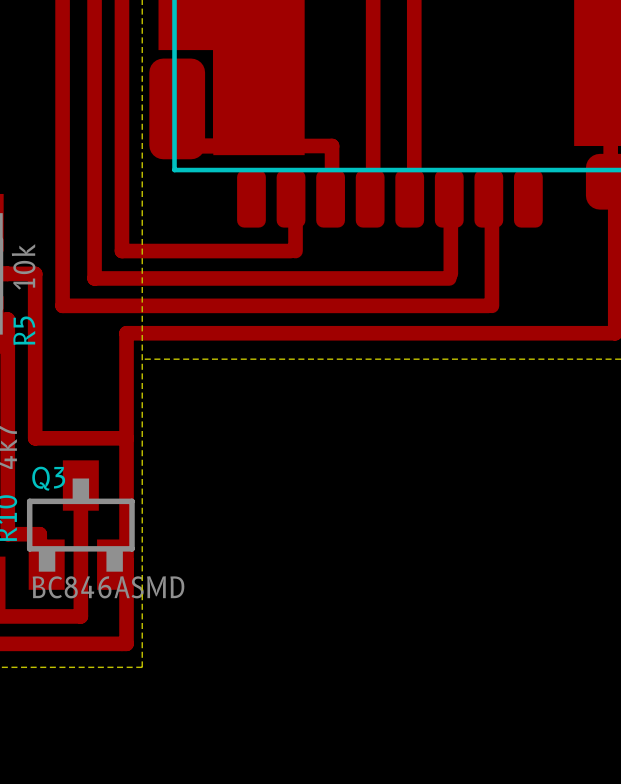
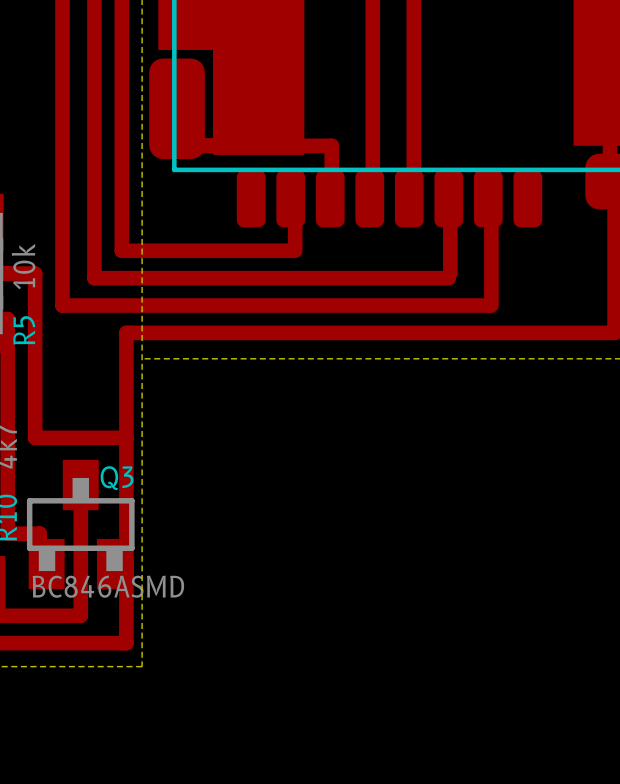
Q3 name position: Q3 (48, 478) -> Q3 (117, 478)

